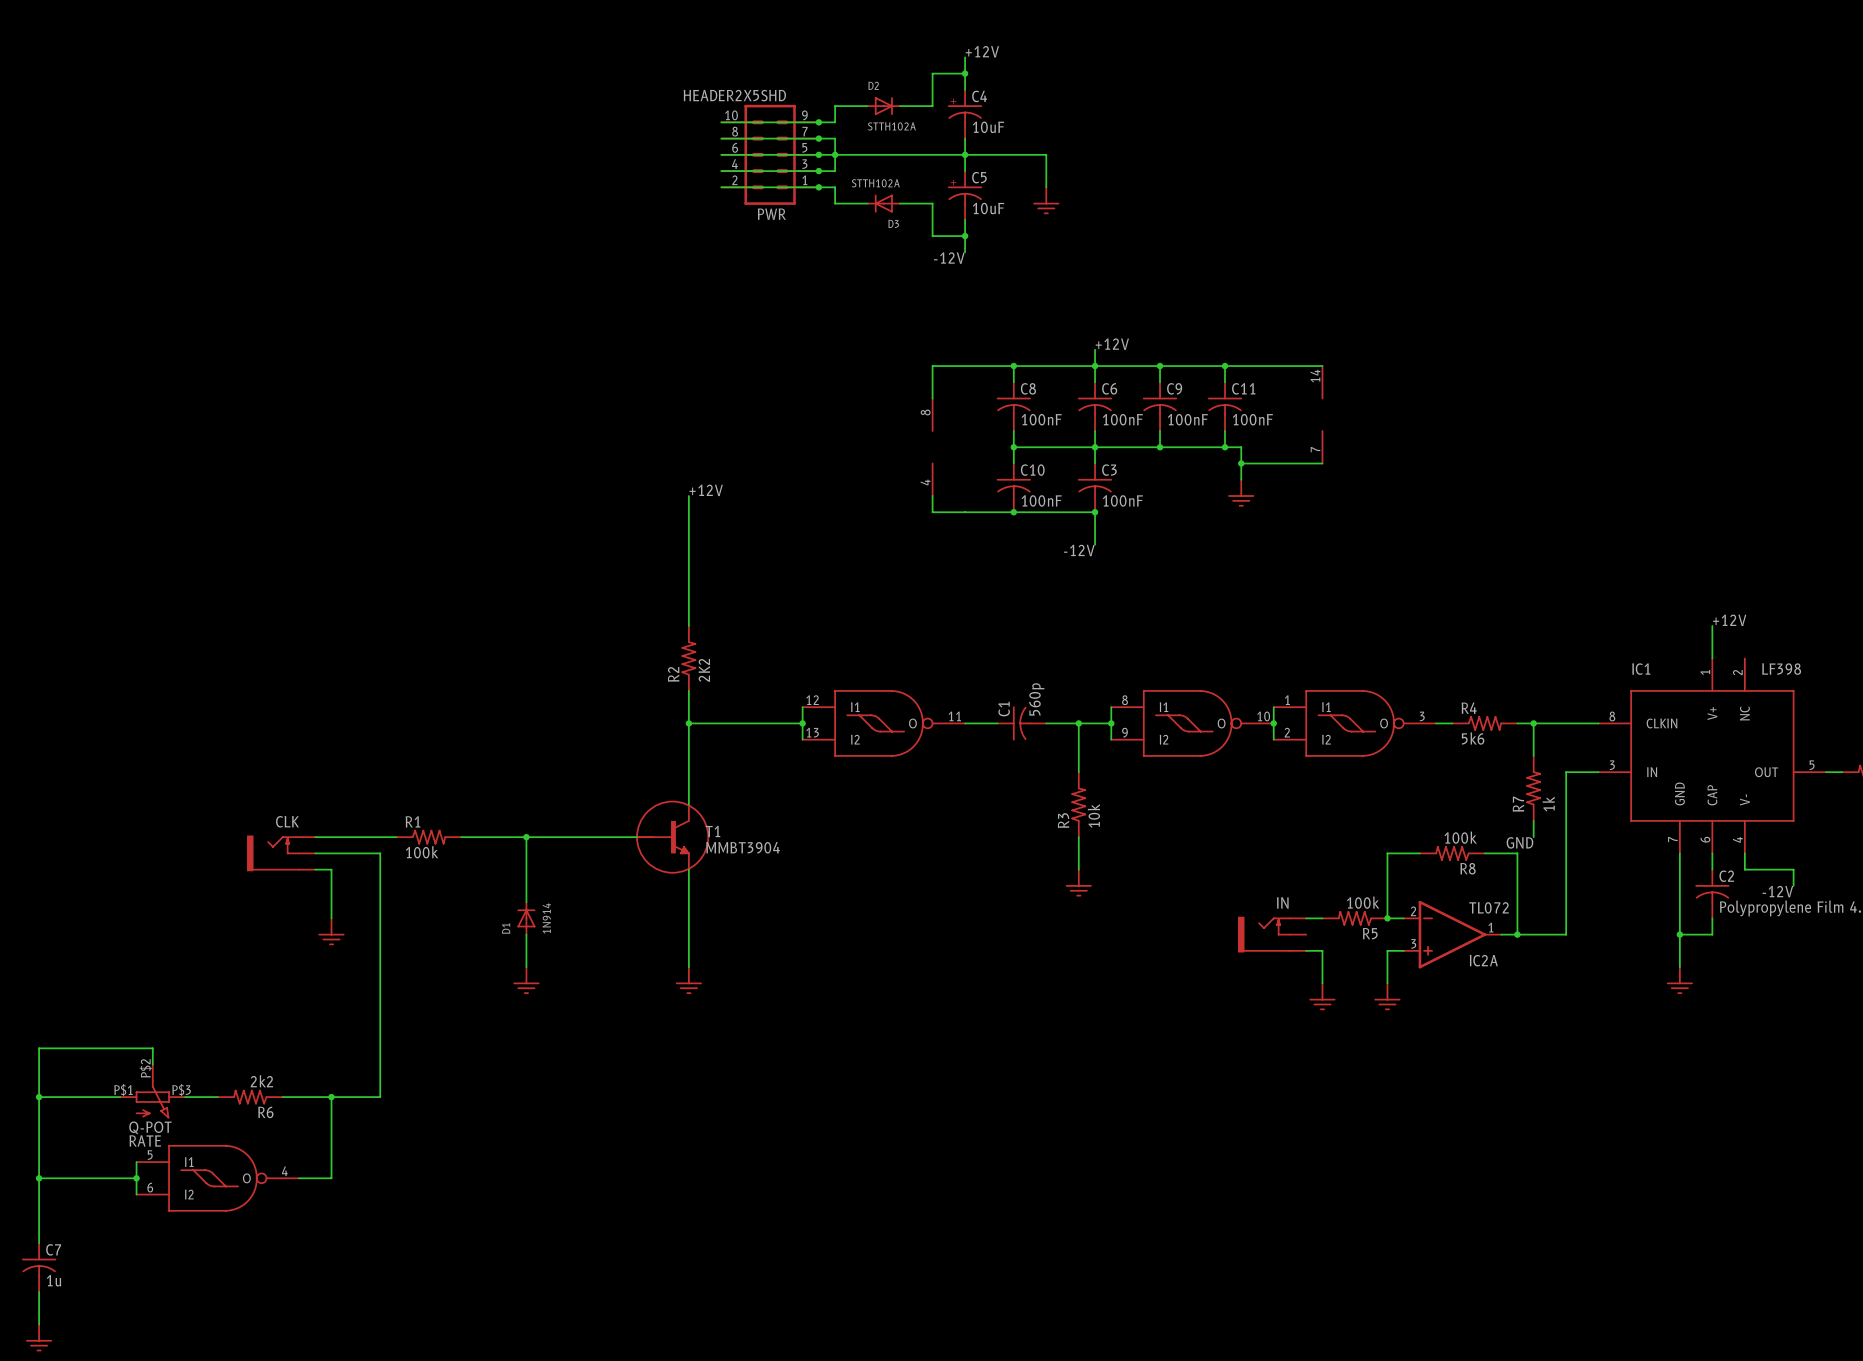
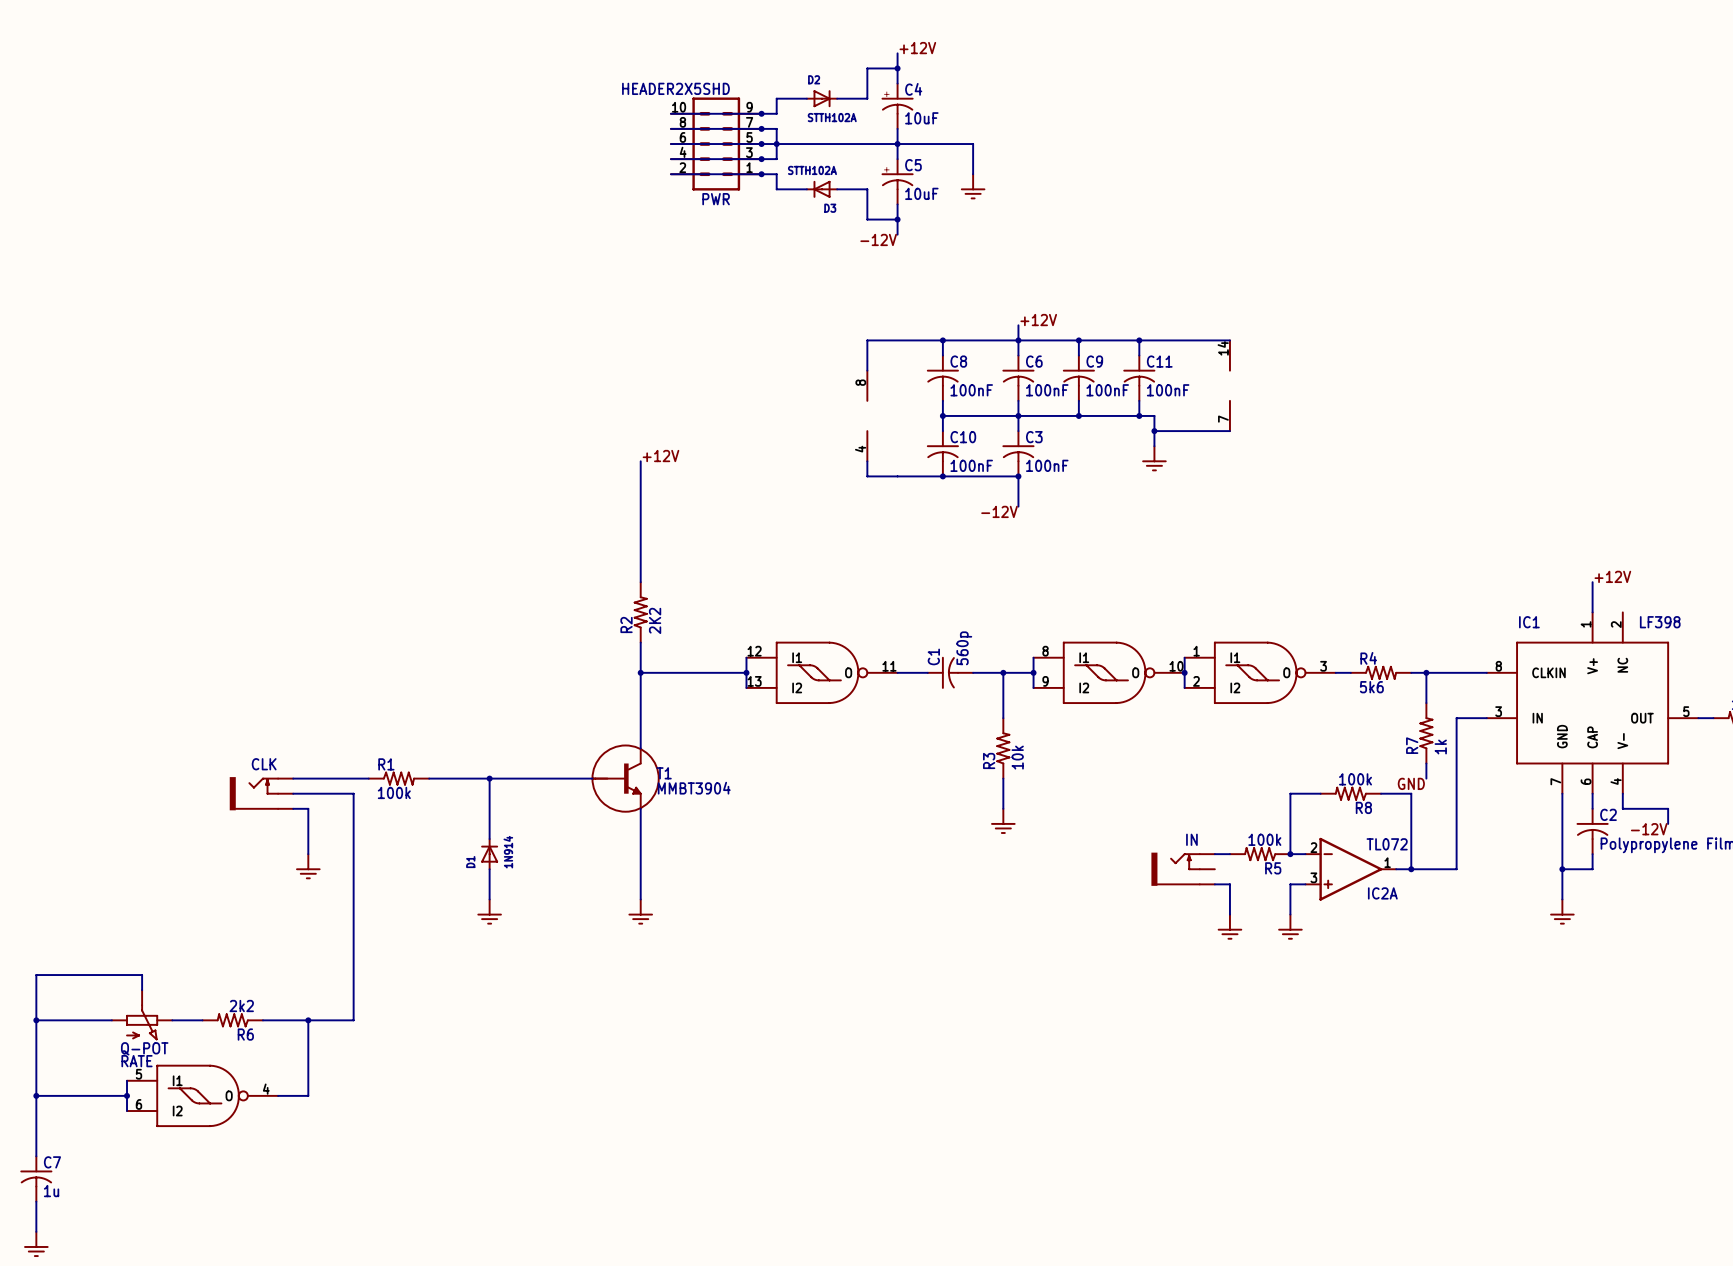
RATE pin number: P$2 (145, 1068) -> none
RATE pin number: P$1 (123, 1090) -> none
RATE pin number: P$3 (181, 1090) -> none

